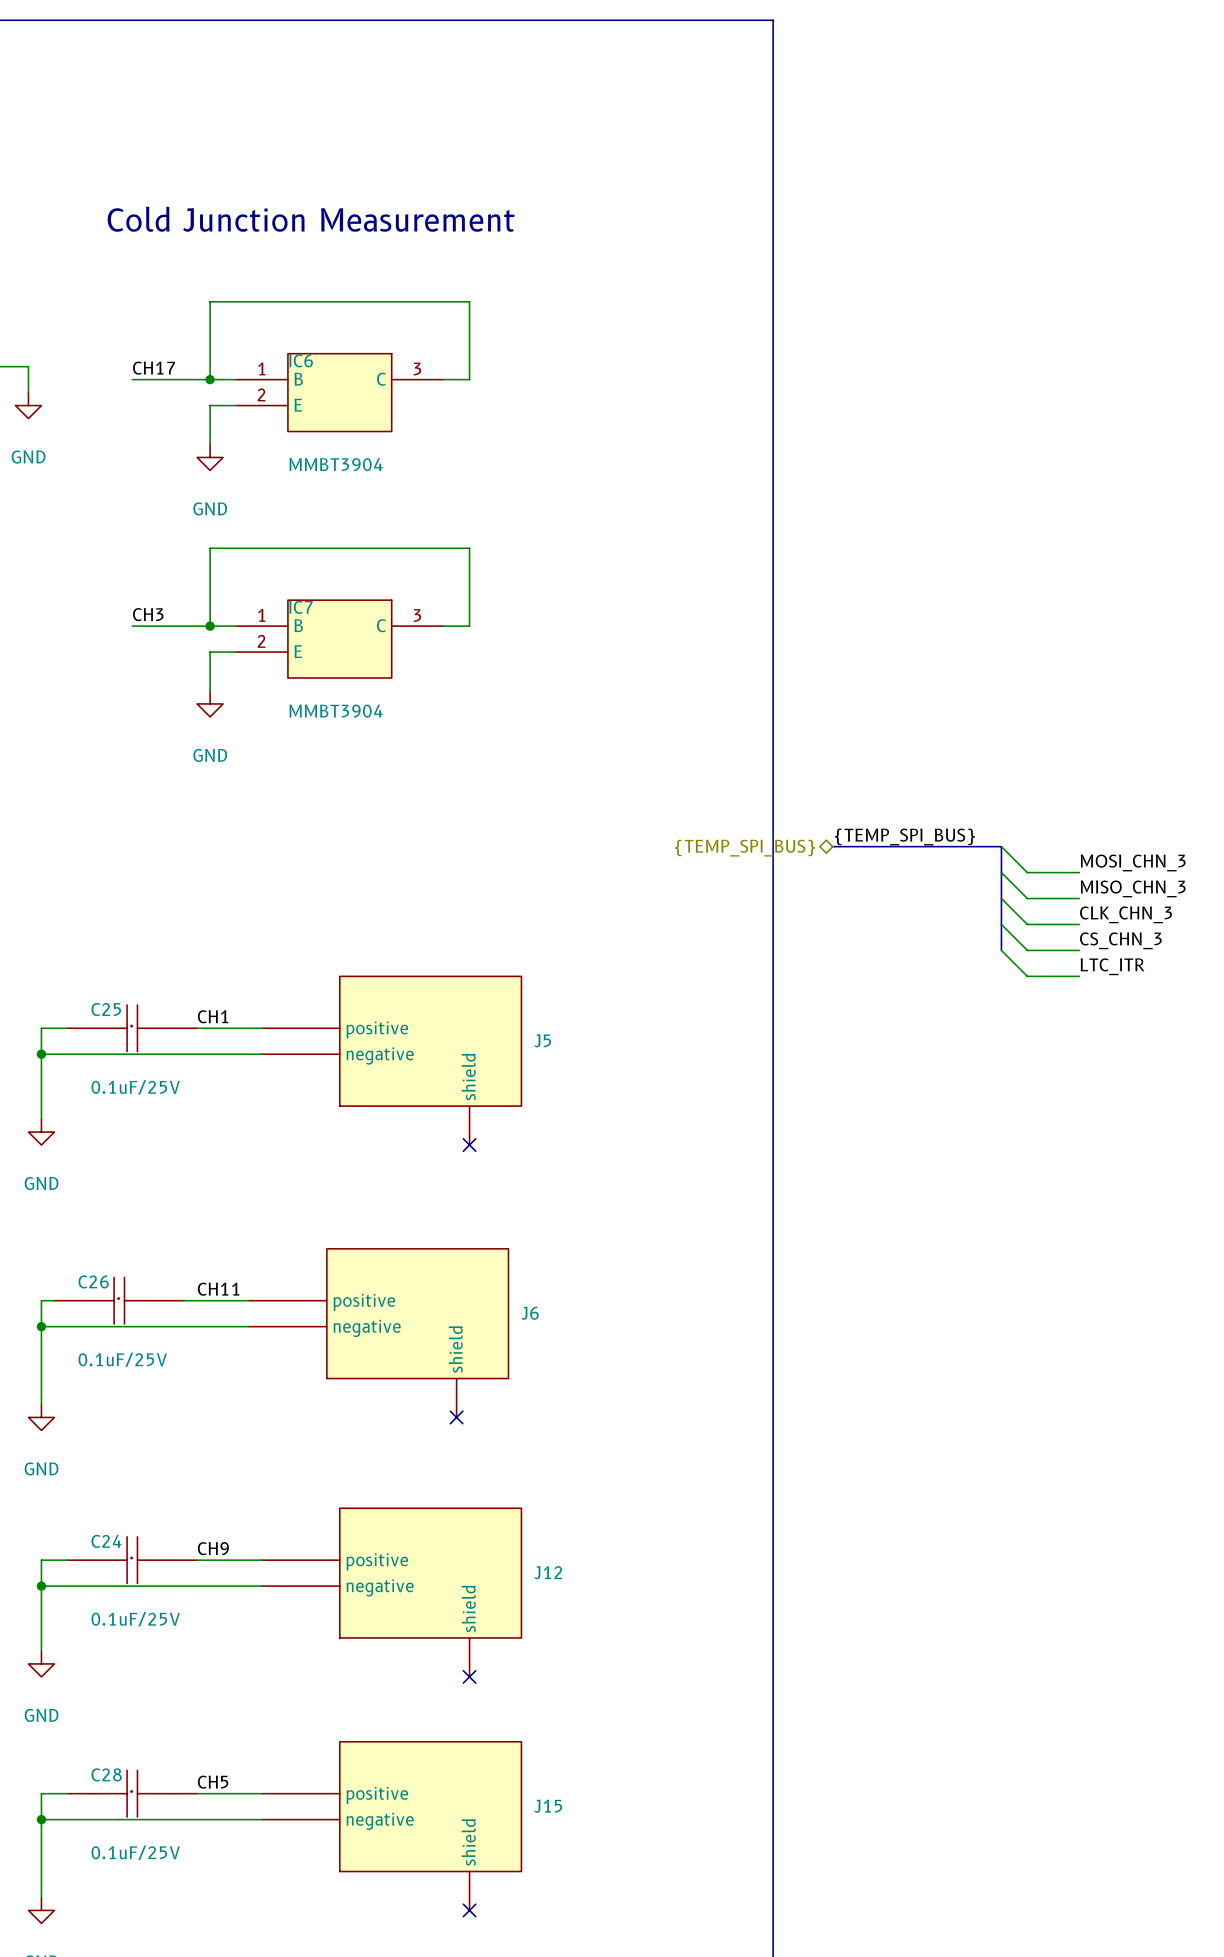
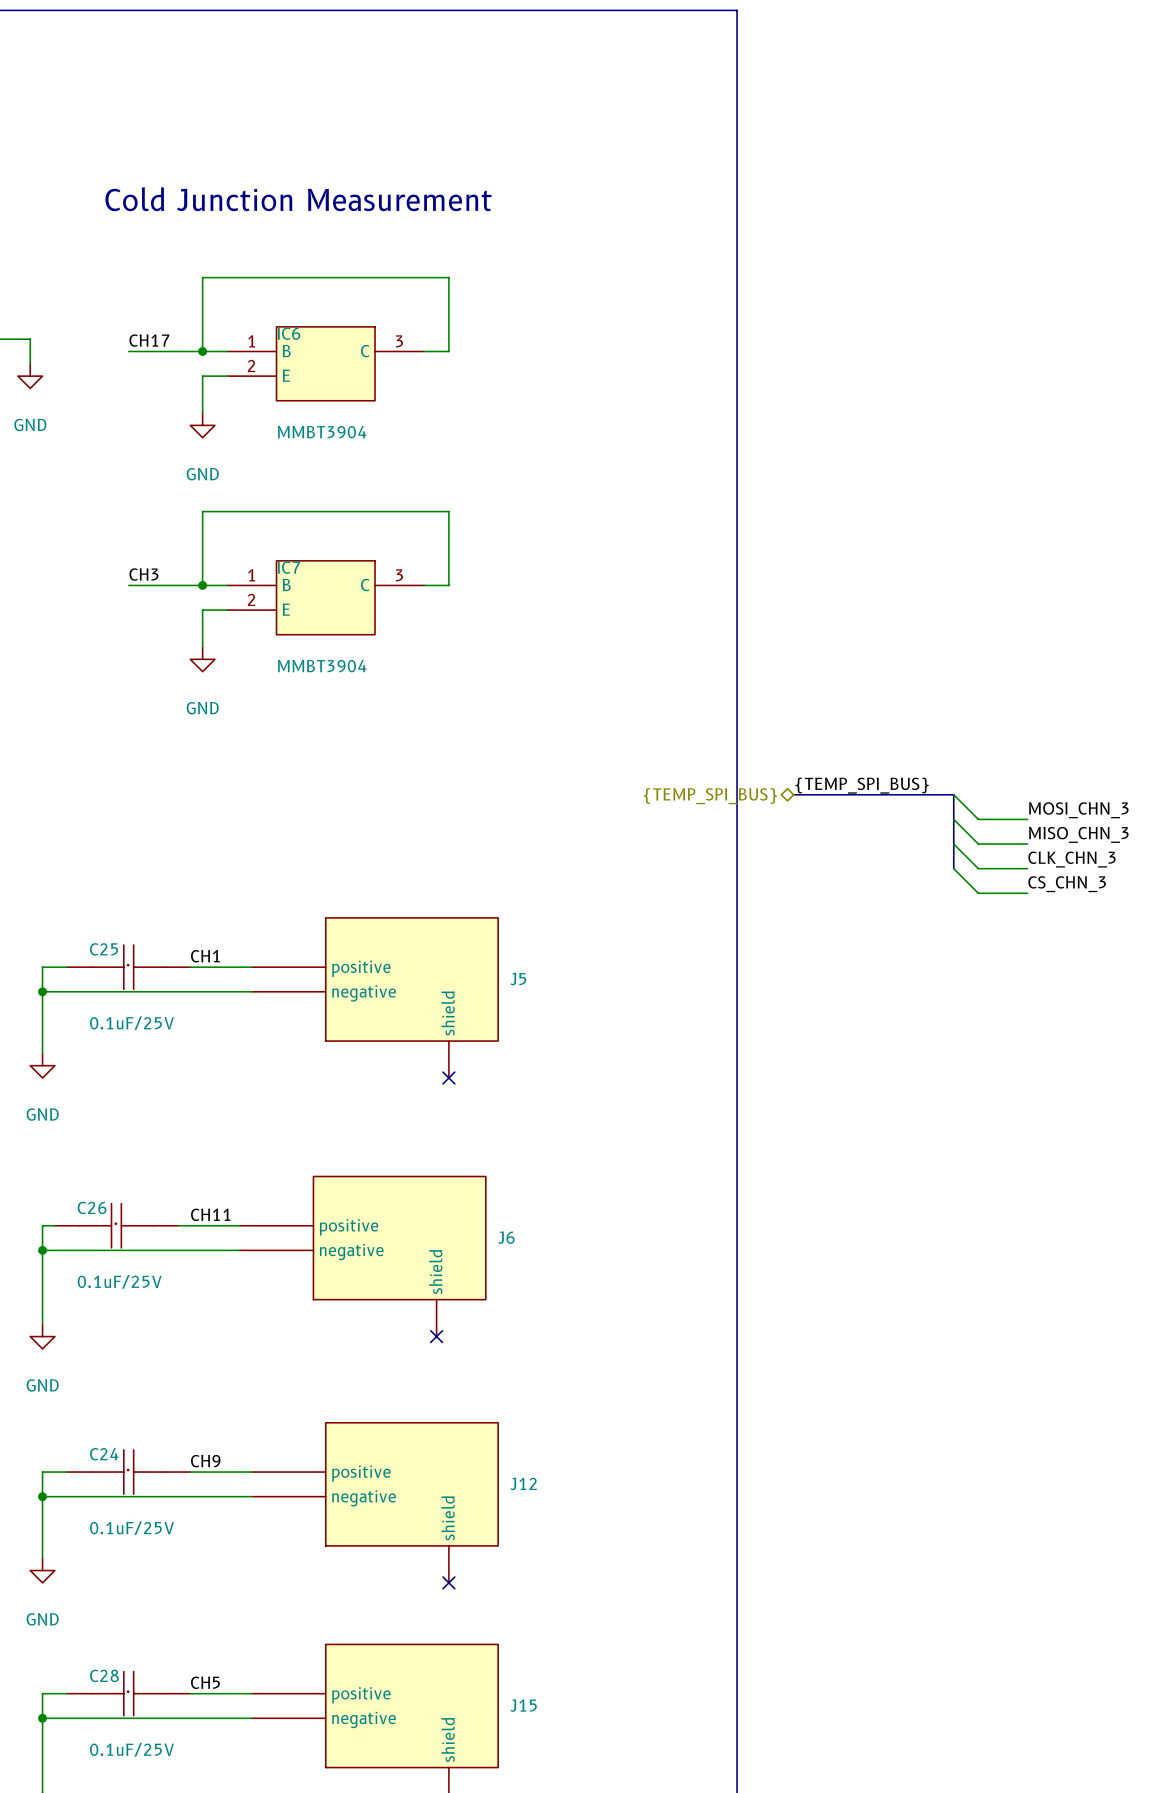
bus: (1001, 924) (1001, 950) -> none
wire: (1001, 950) (1027, 976) (1079, 976) -> none
label: LTC_ITR (1112, 966) -> none

